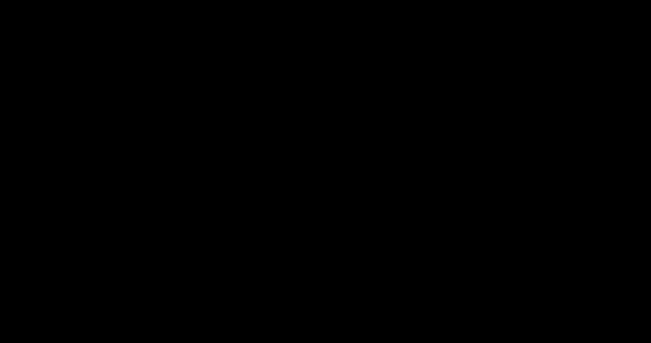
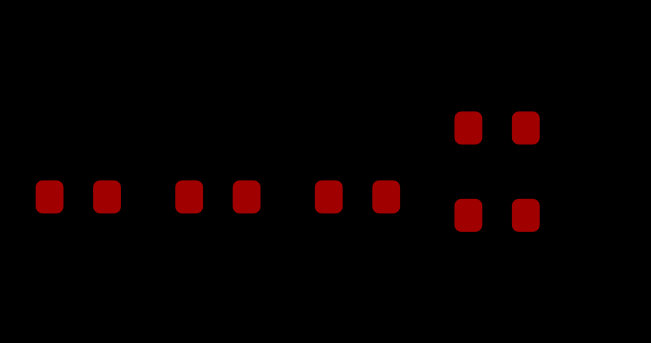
part: none -> (497, 127)
part: none -> (78, 196)
part: none -> (217, 196)
part: none -> (357, 196)
part: none -> (497, 215)

